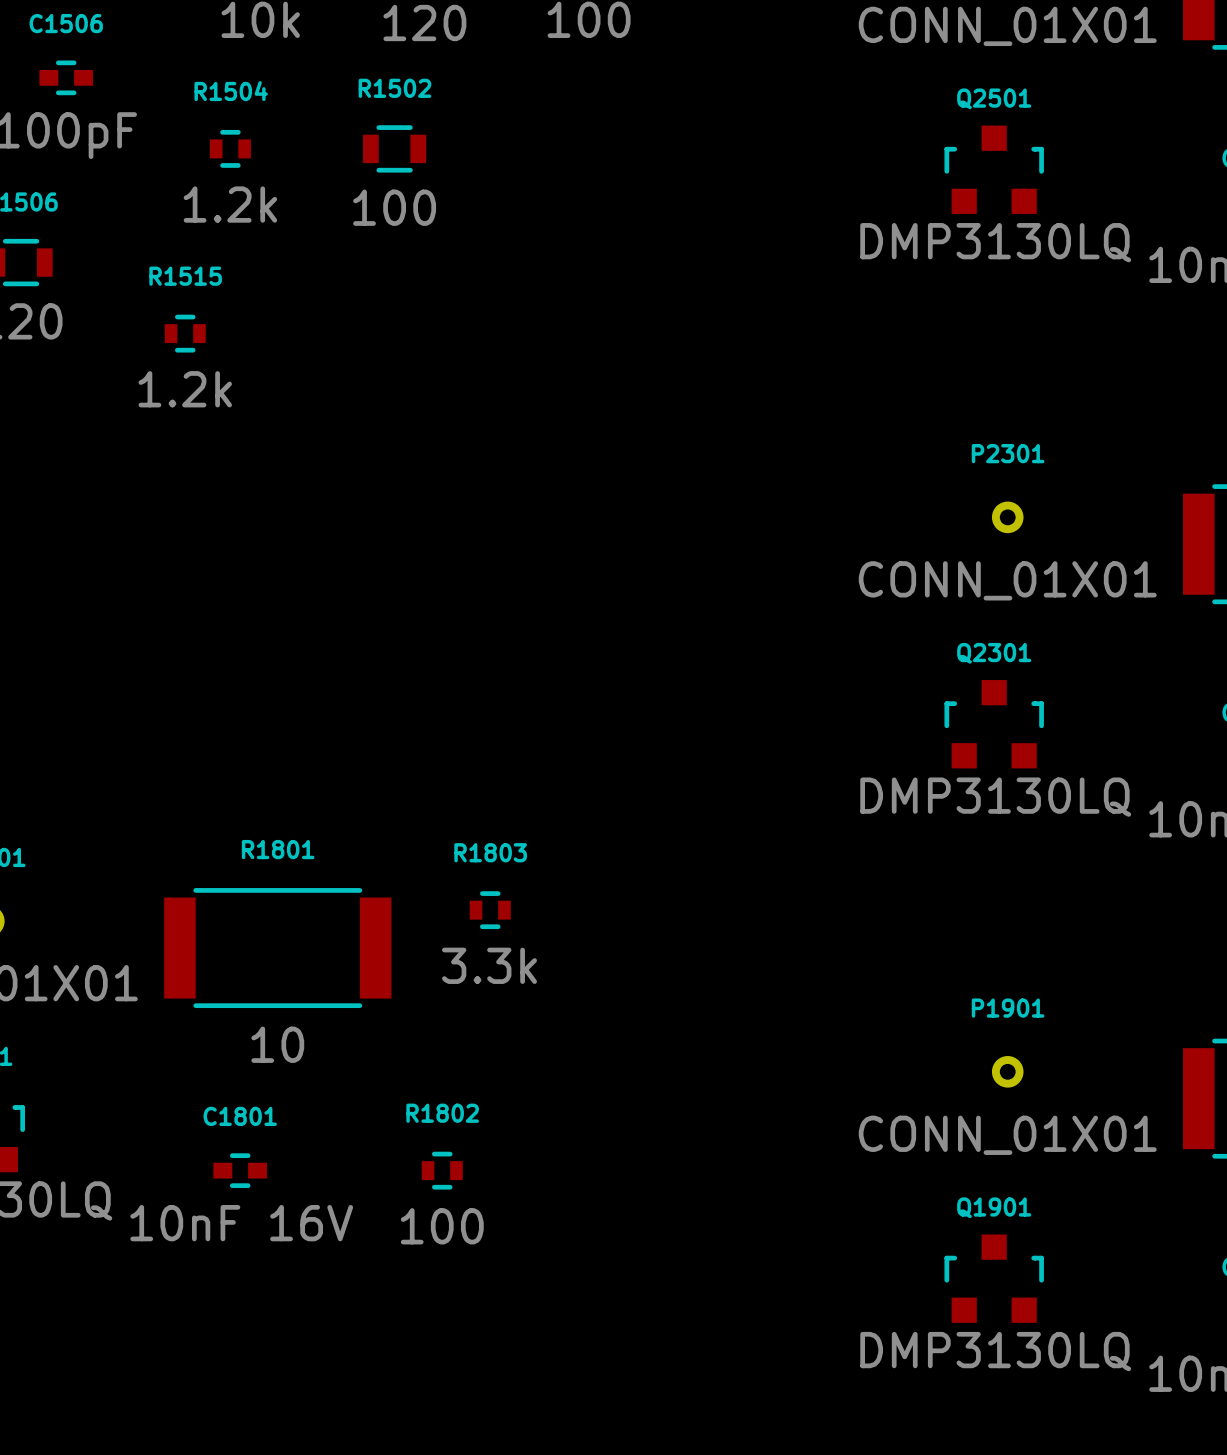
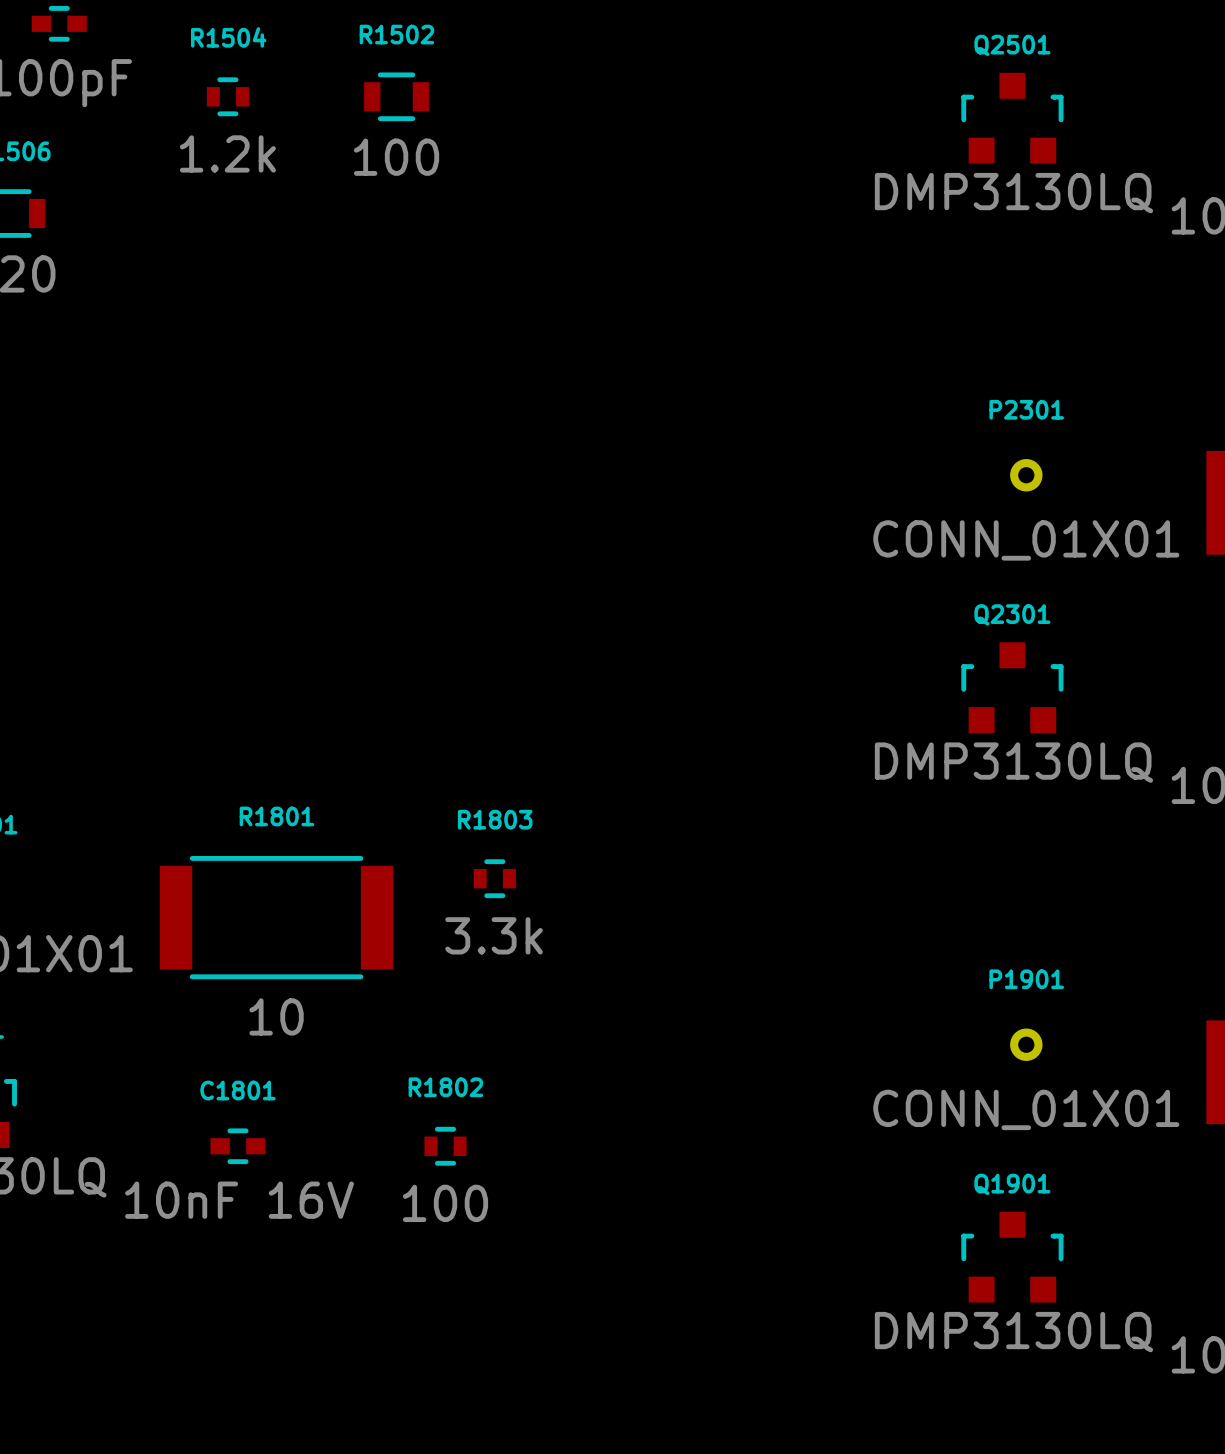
R1515: 1.2k (185, 333) -> none

